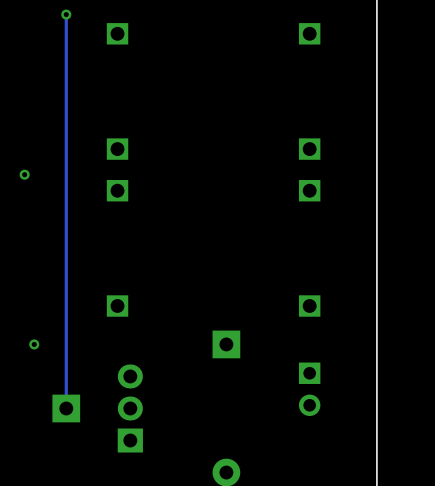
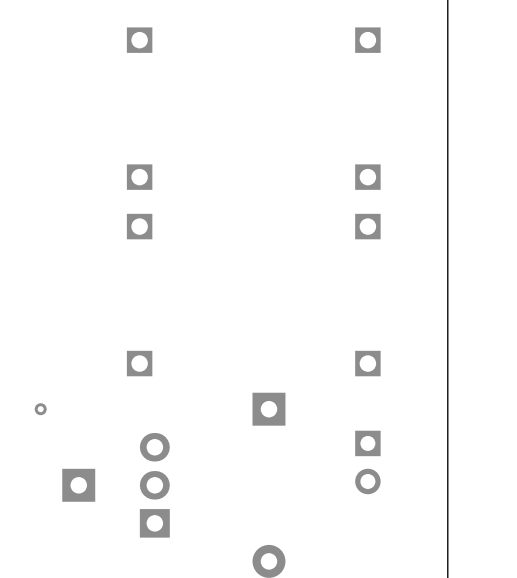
track: (66, 14) (66, 408) -> none
via: (66, 14) -> none
via: (24, 174) -> none

